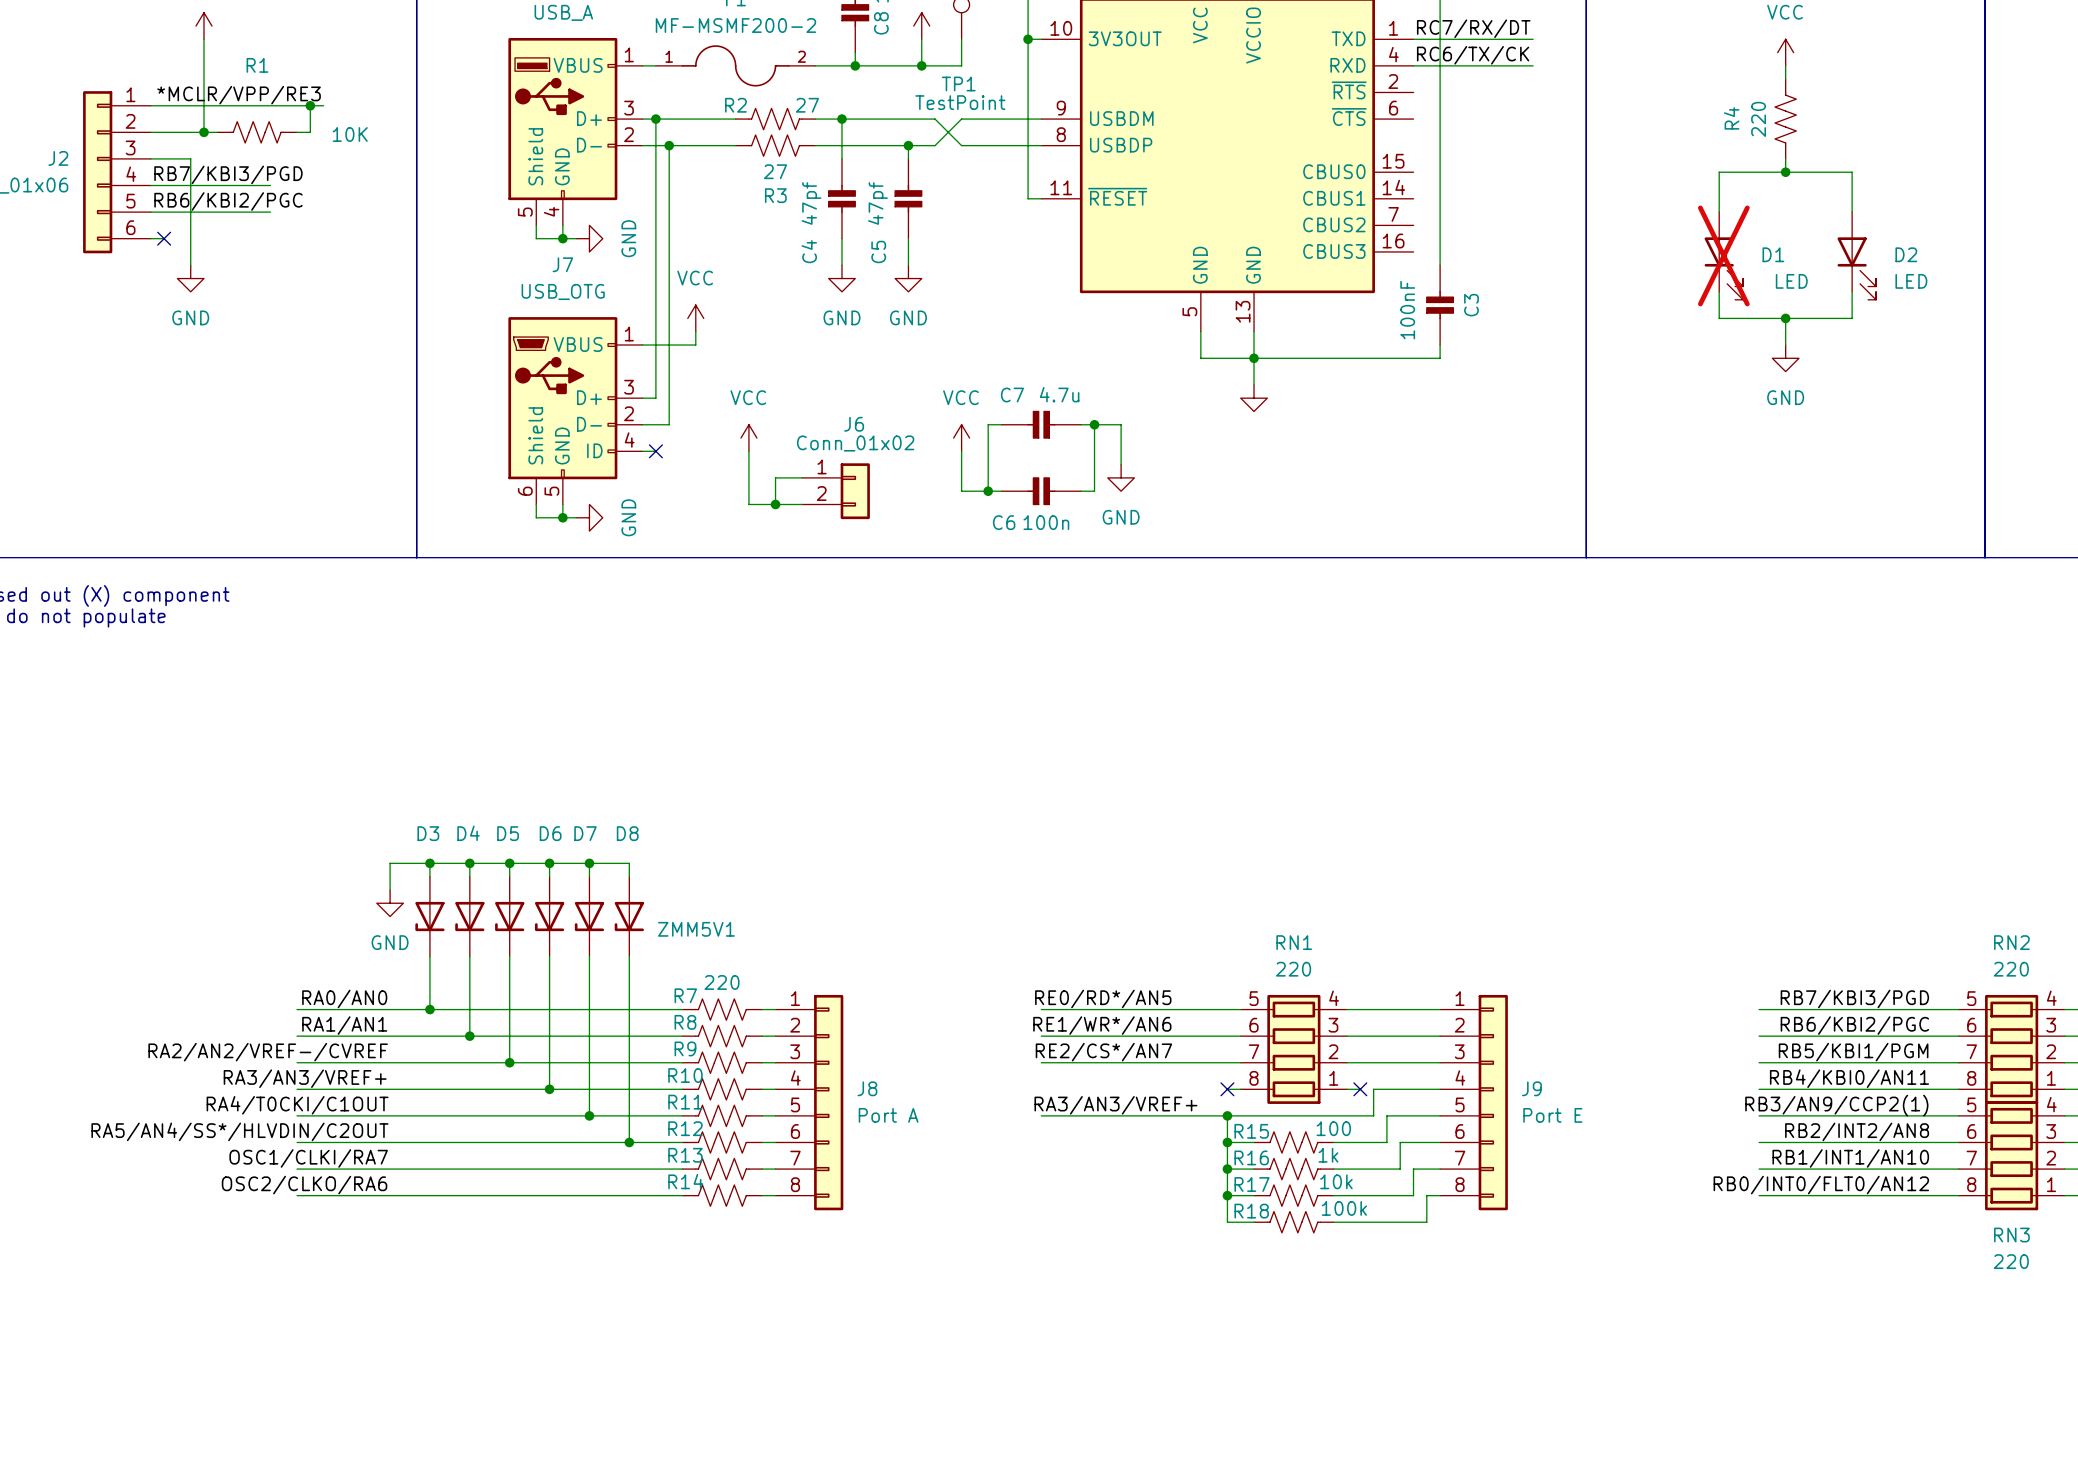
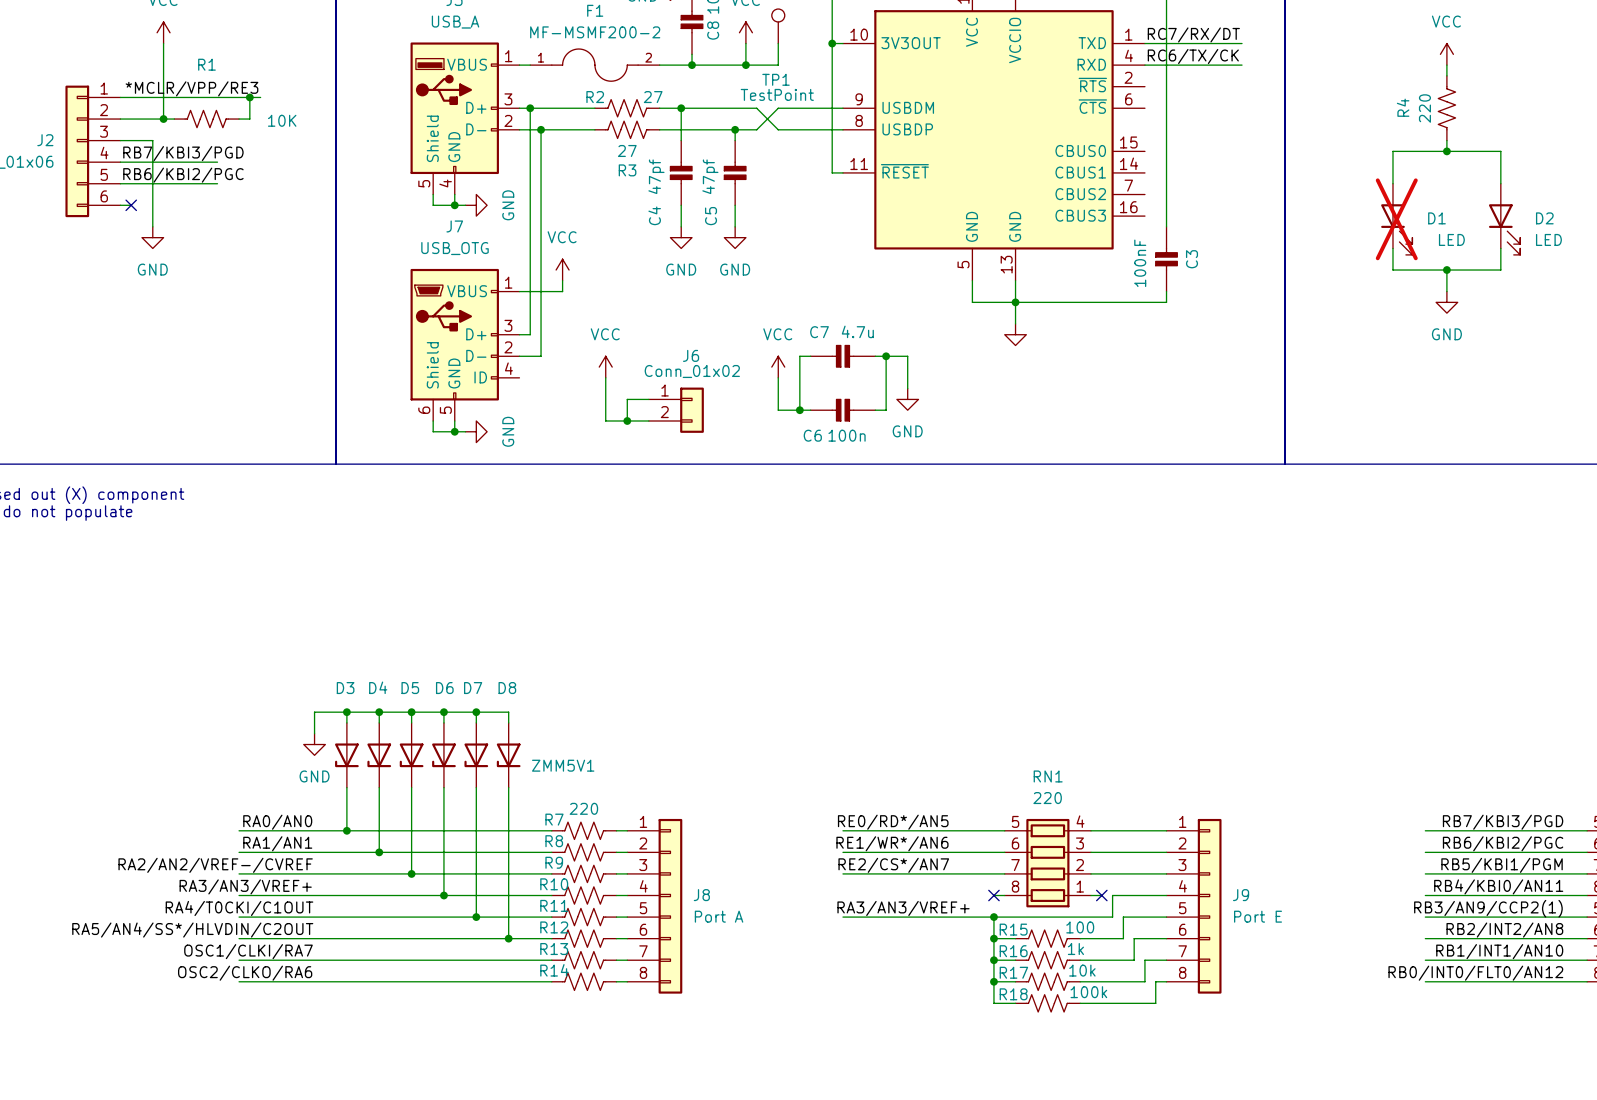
wire: (642, 451) (655, 451) -> none
no-connect mark: (655, 451) -> none

